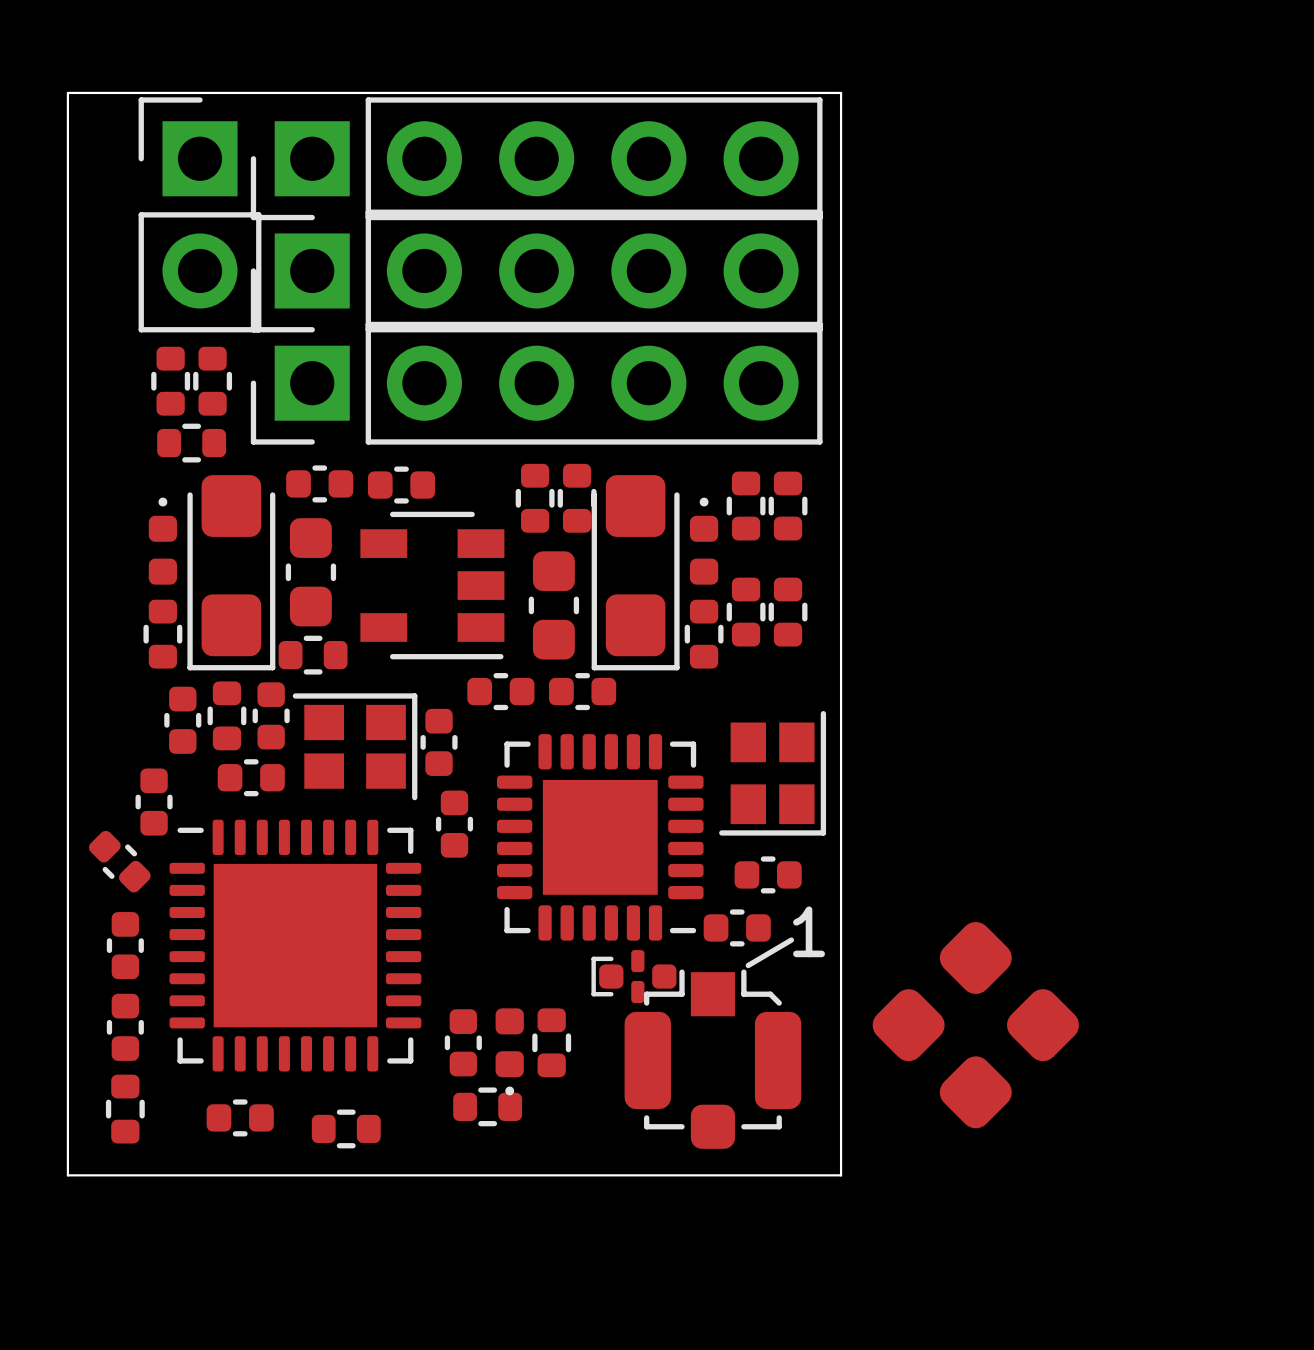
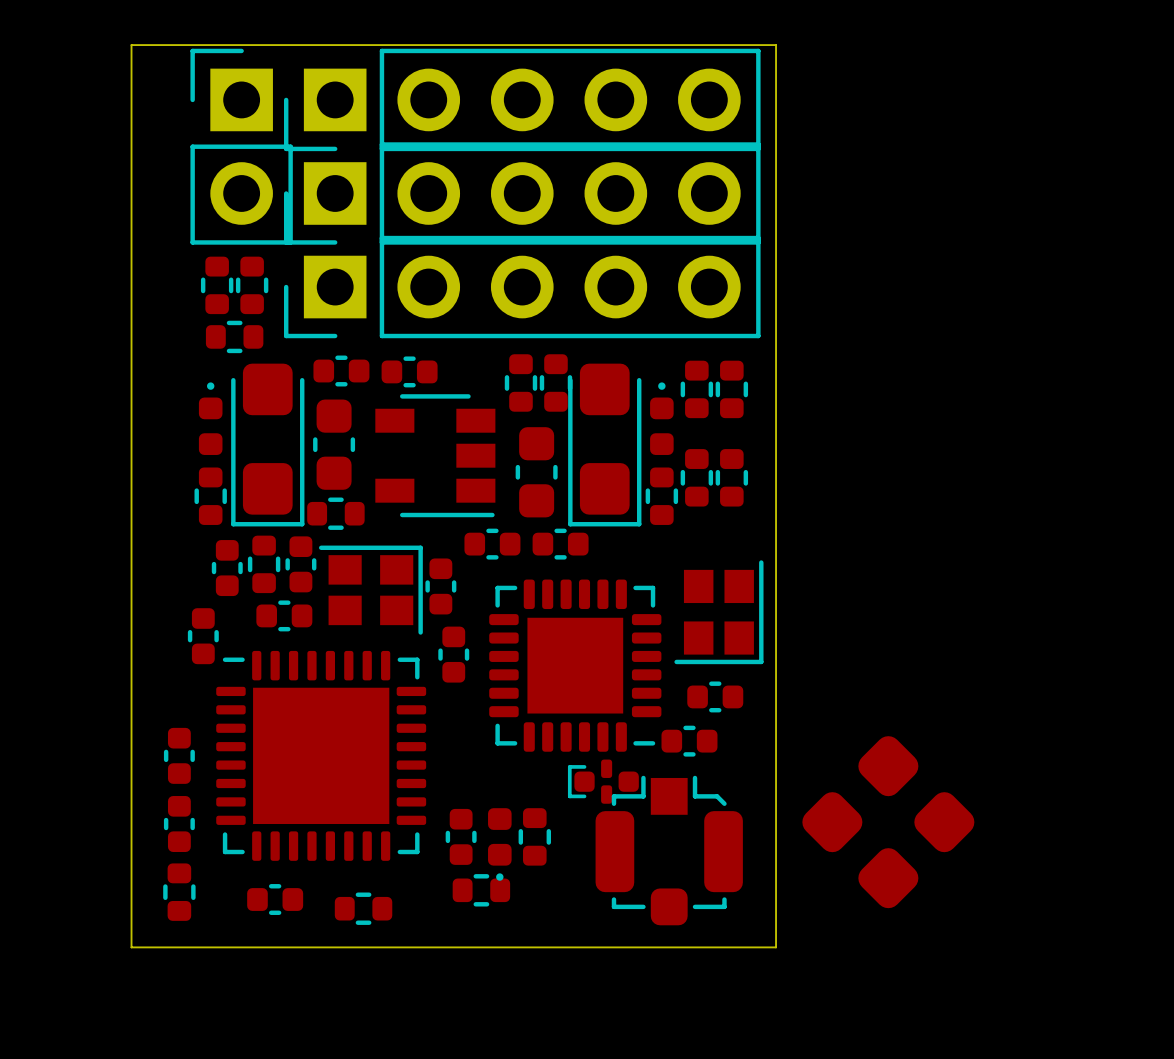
part: (119, 861) -> none
text: 1 (809, 931) -> none
line: (791, 940) (748, 965) -> none

